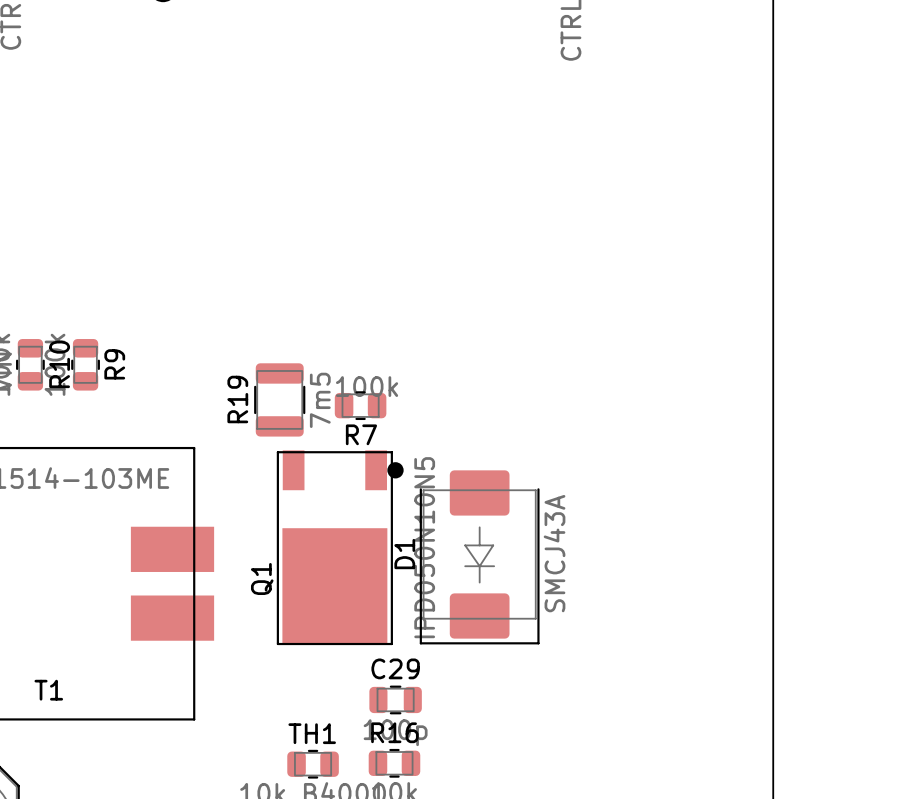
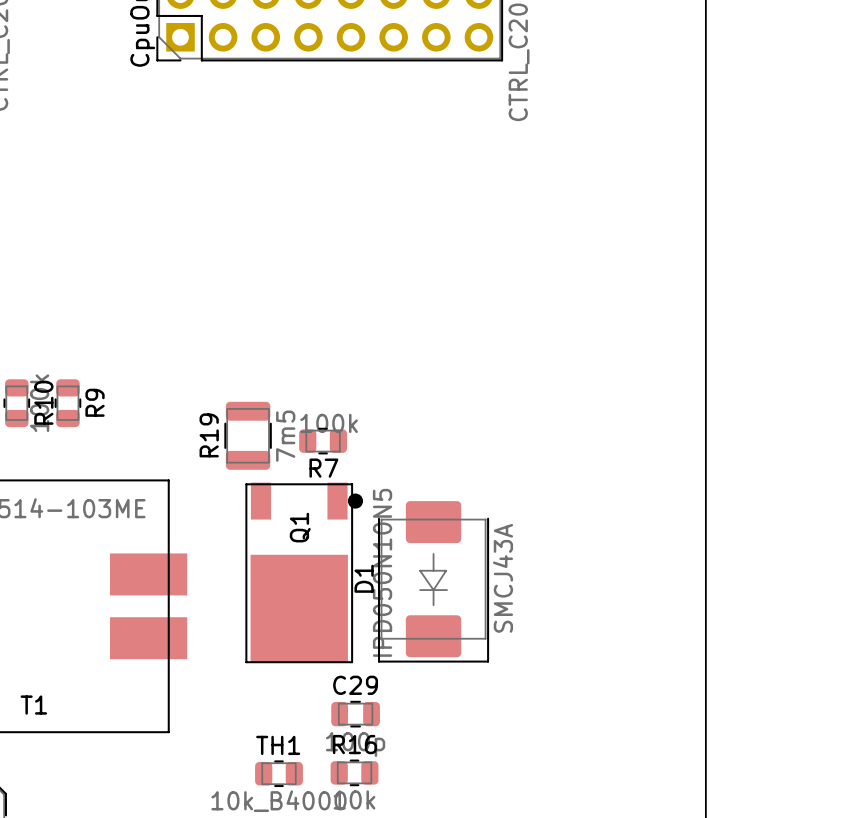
Q1 name position: Q1 (262, 578) -> Q1 (300, 527)

